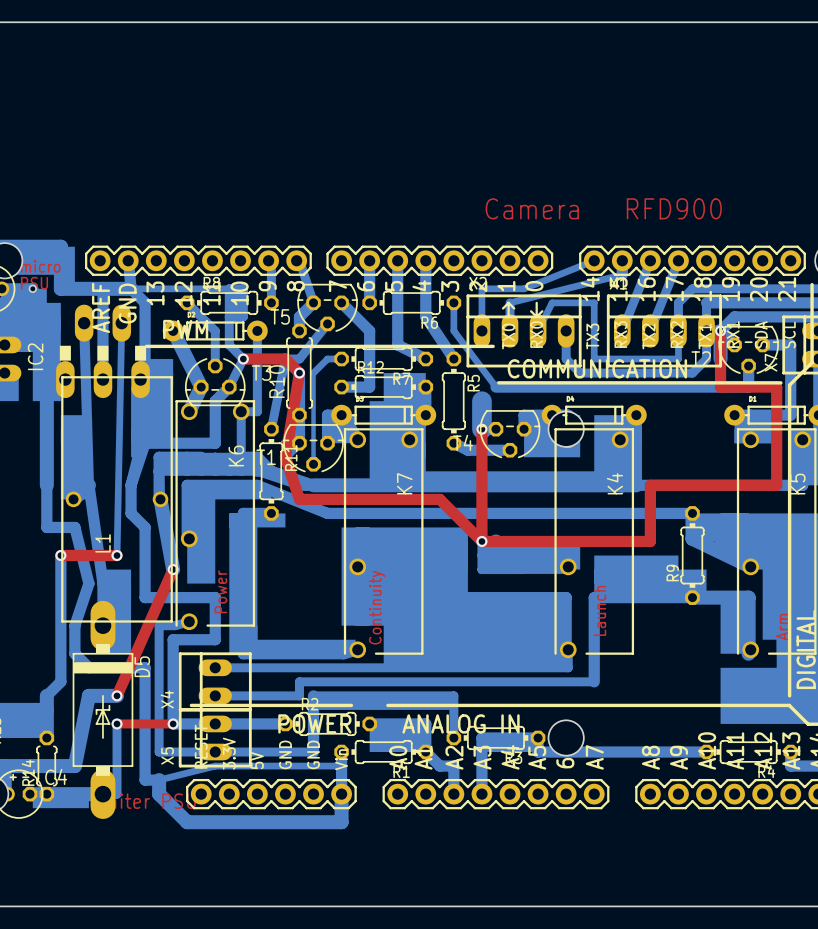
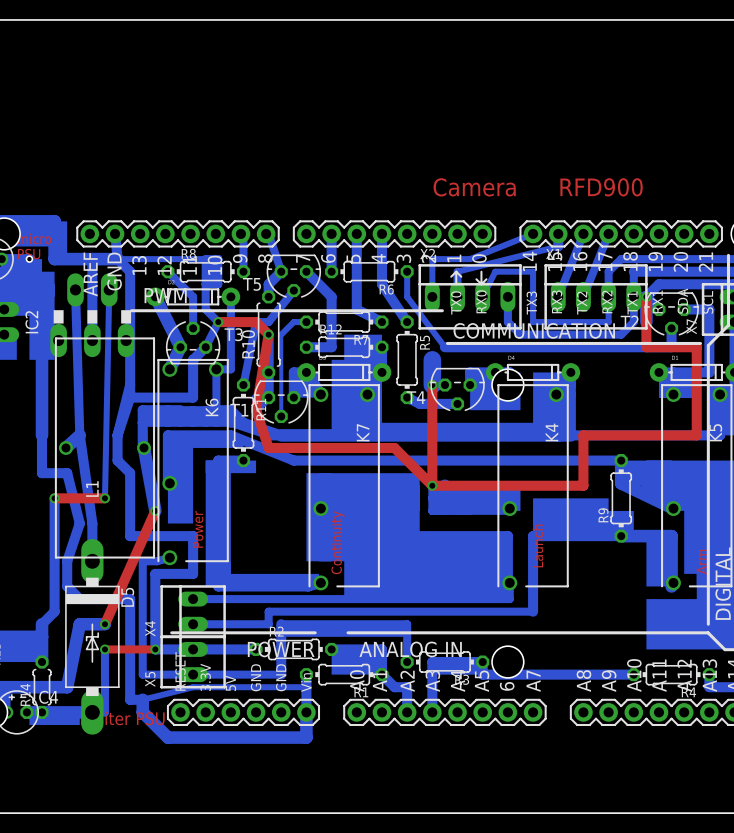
drawing: [131, 359, 174, 458] -> none
drawing: [60, 415, 89, 500] -> none
drawing: [102, 569, 132, 654] -> none

